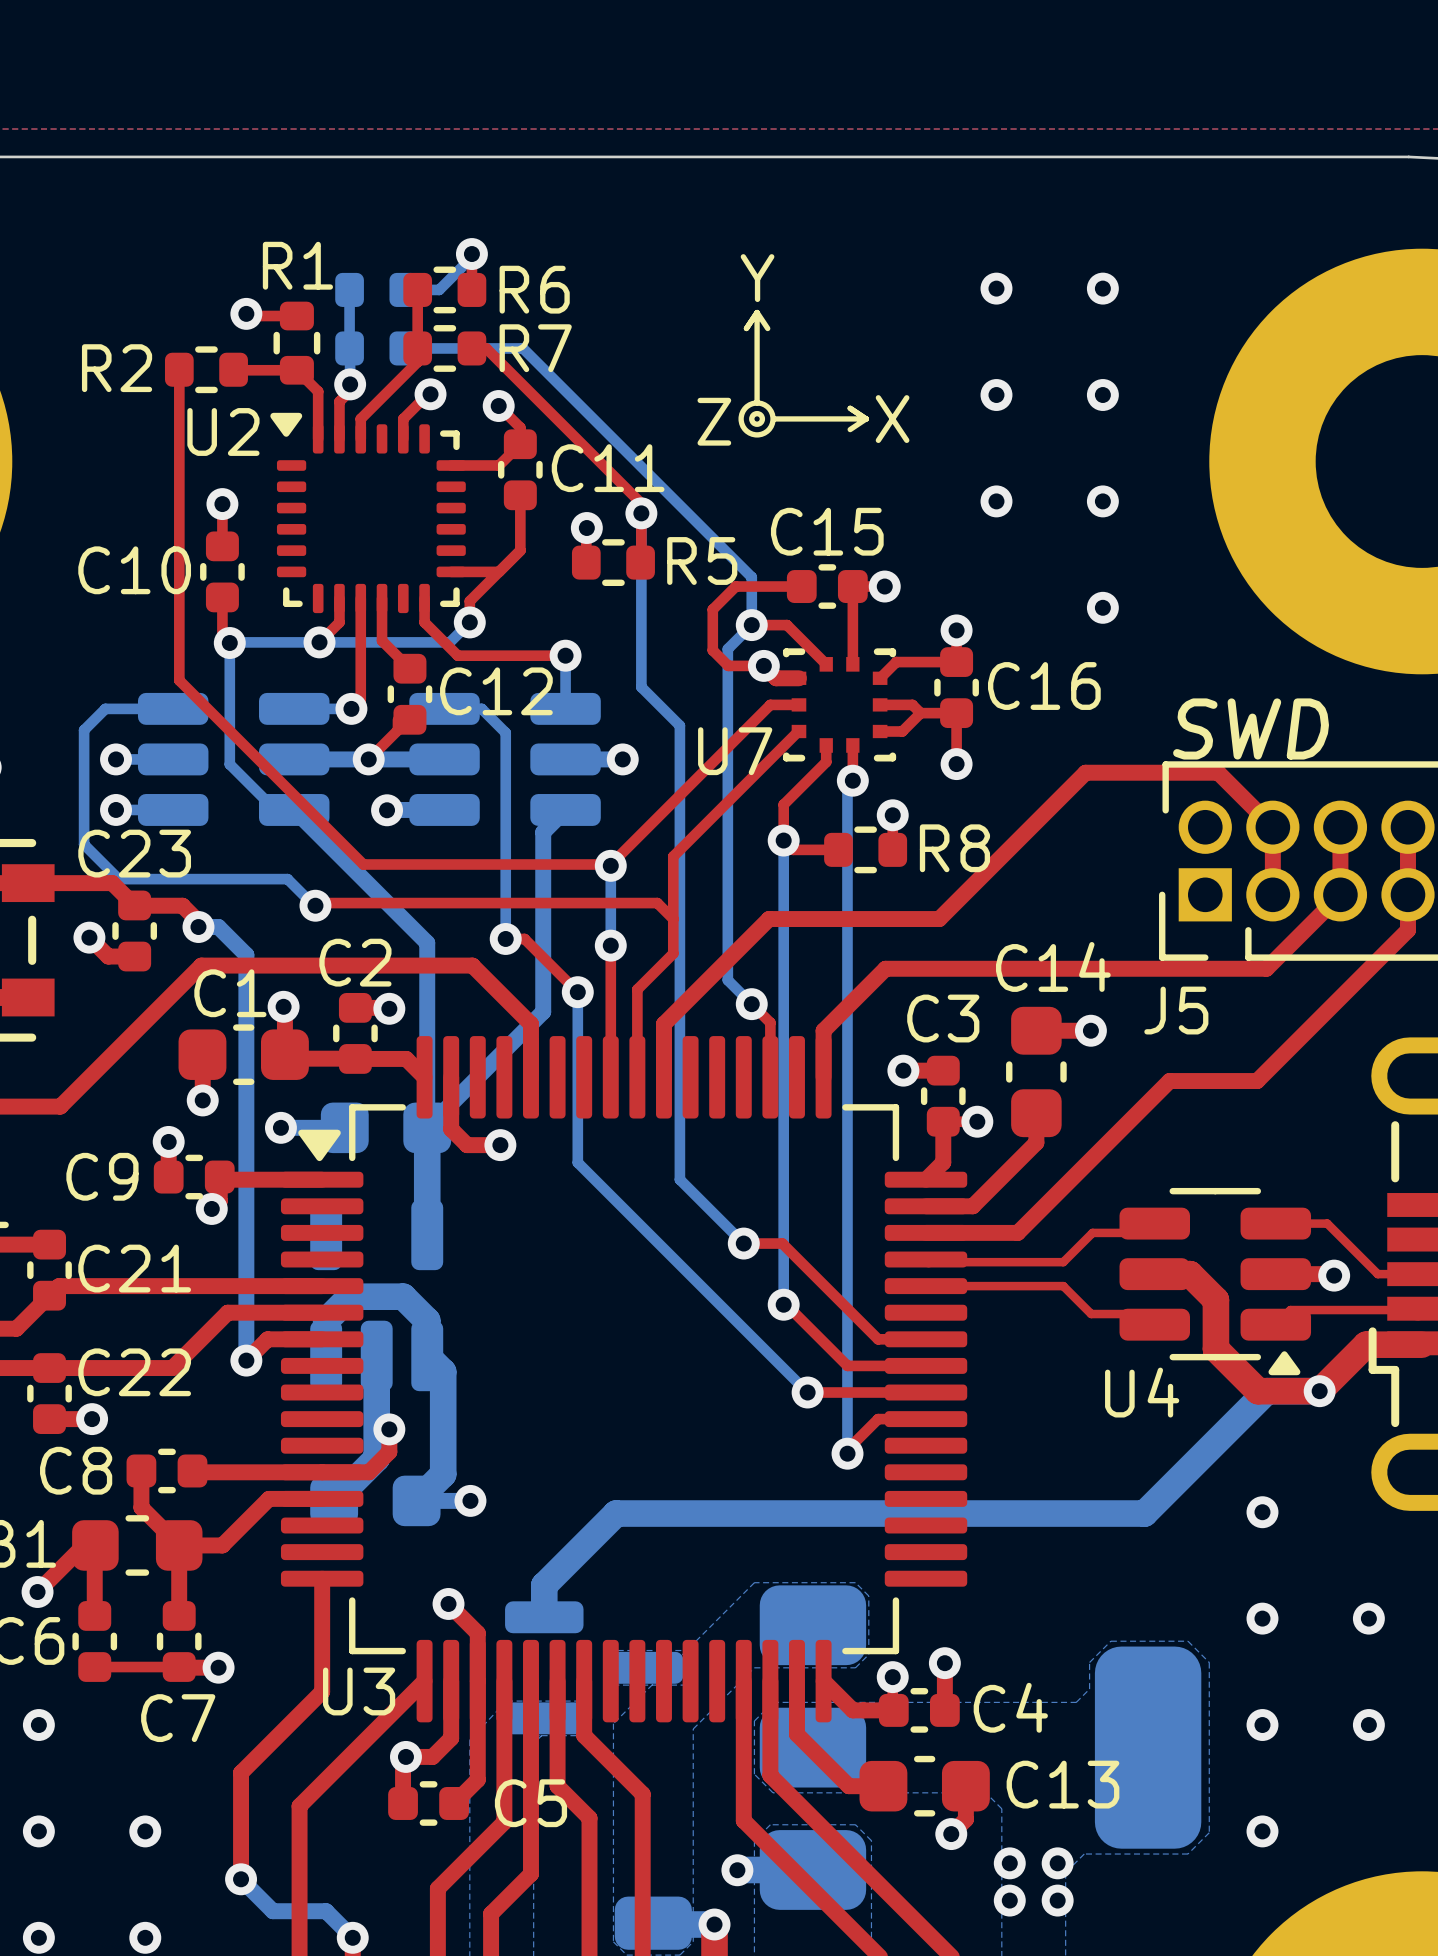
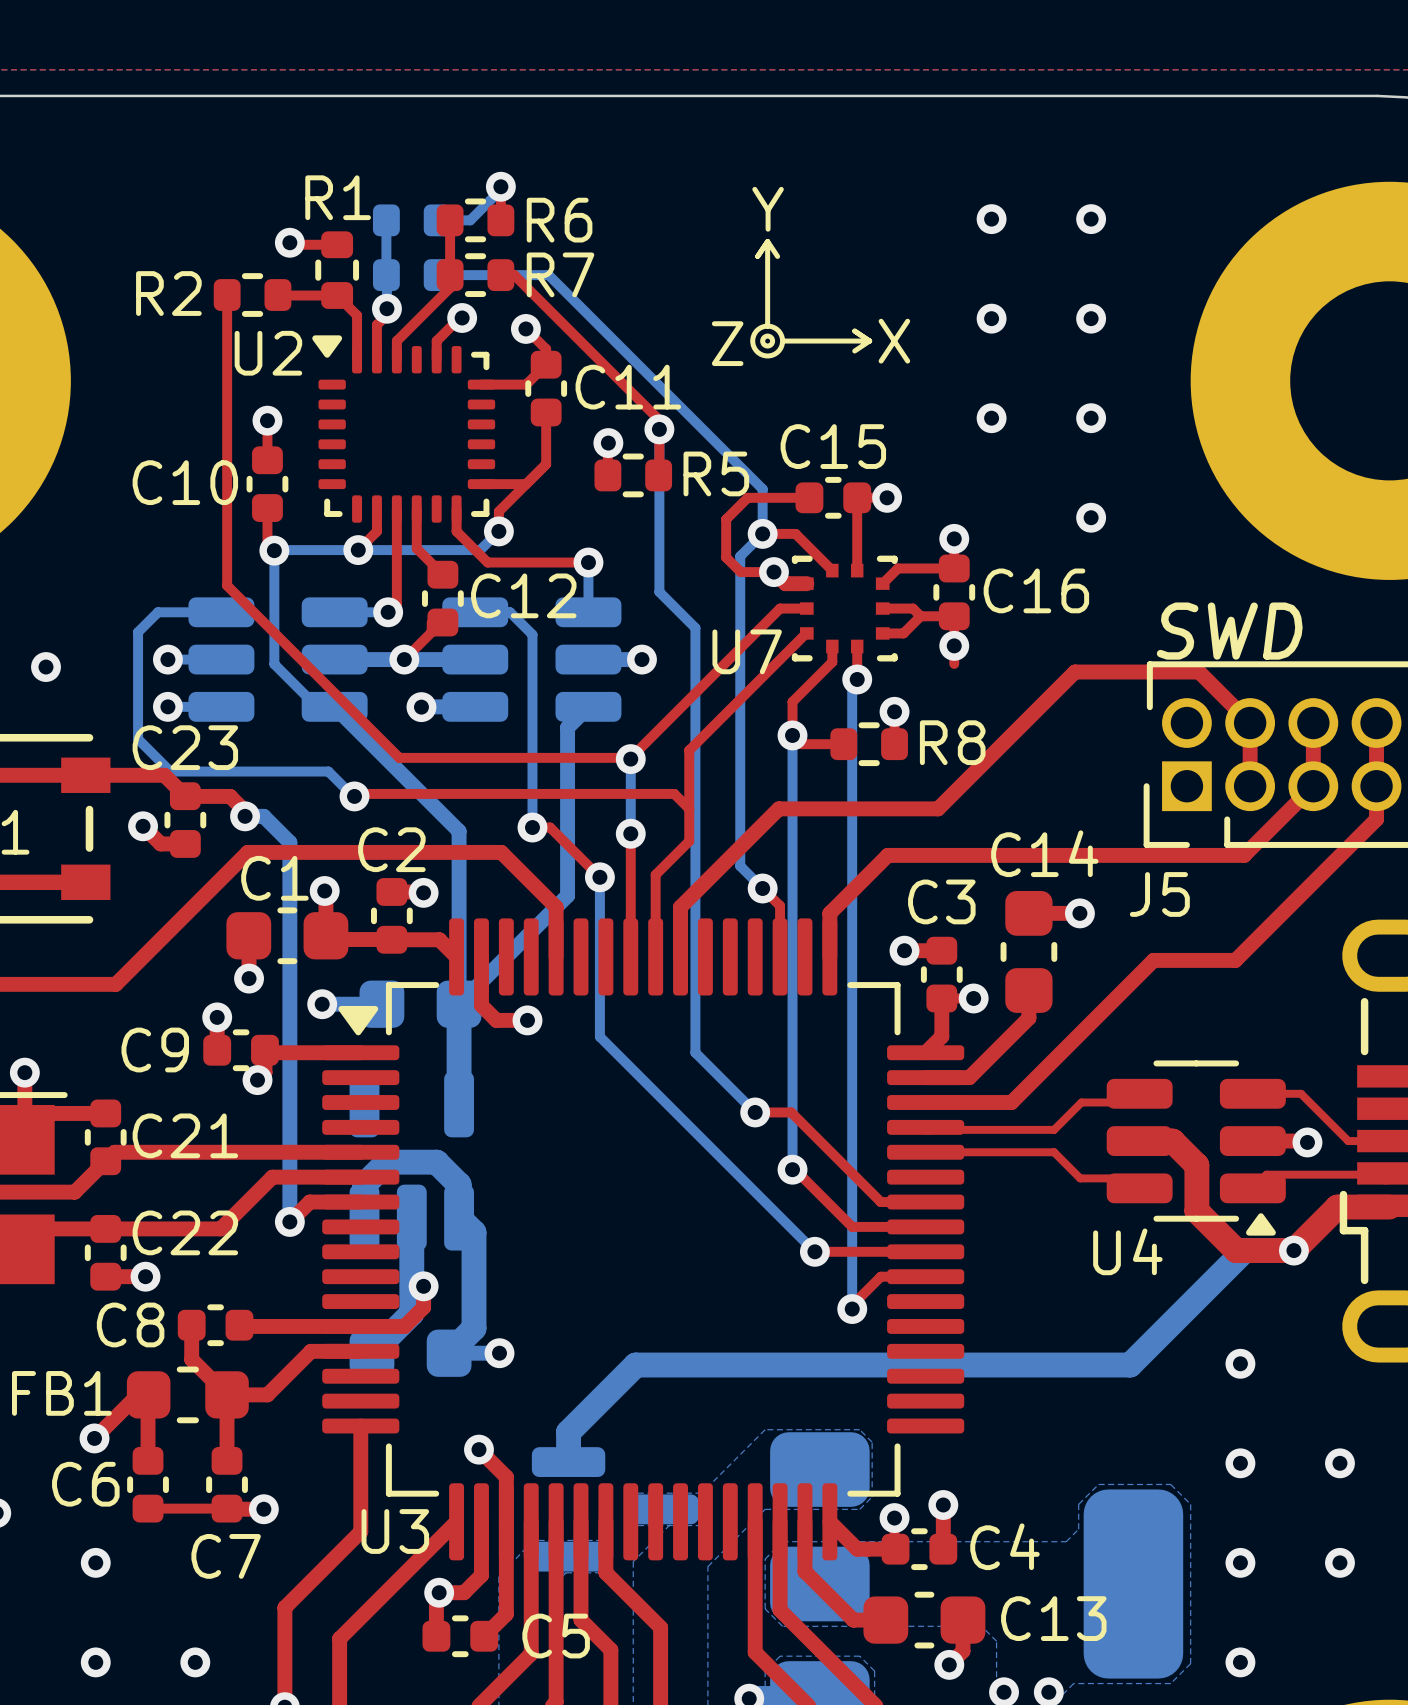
via position: (956, 764) -> (954, 645)

